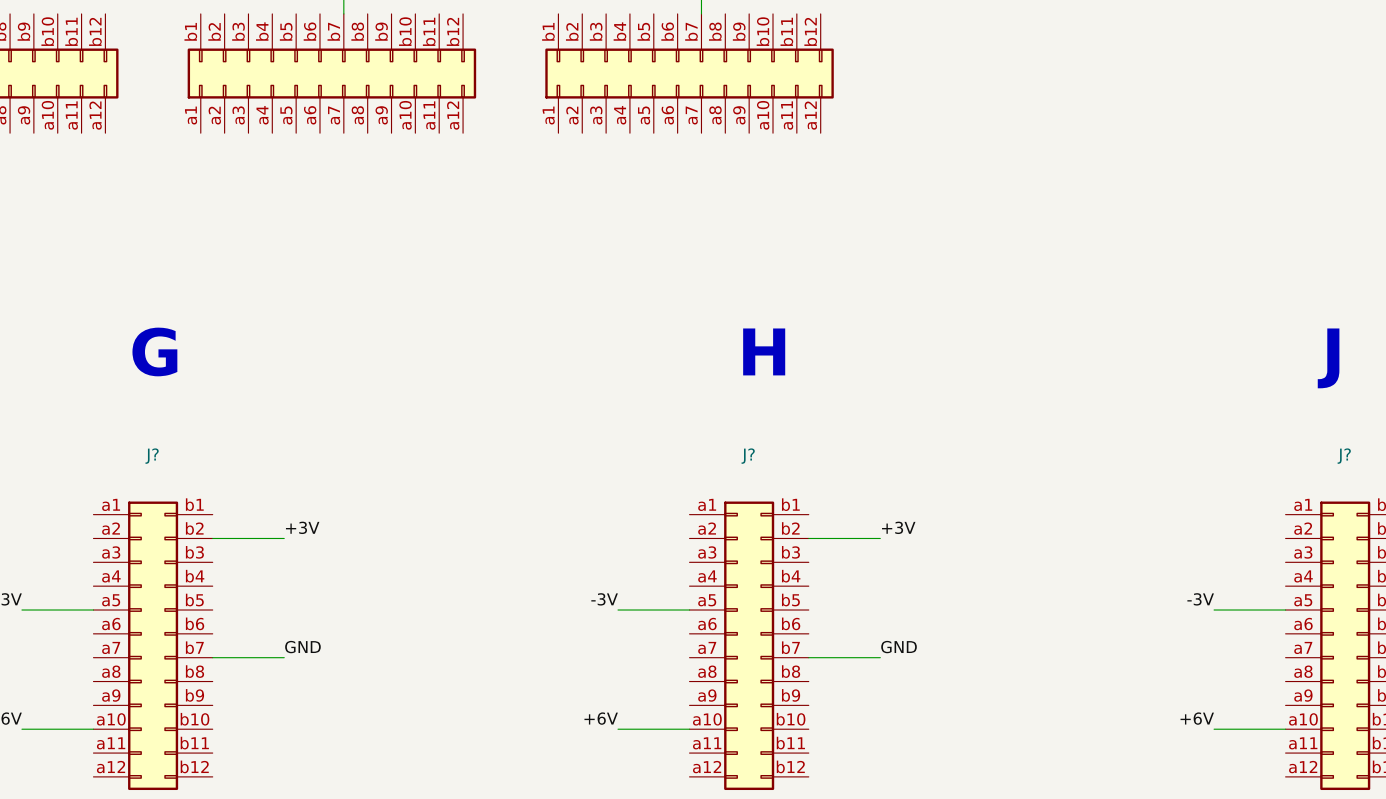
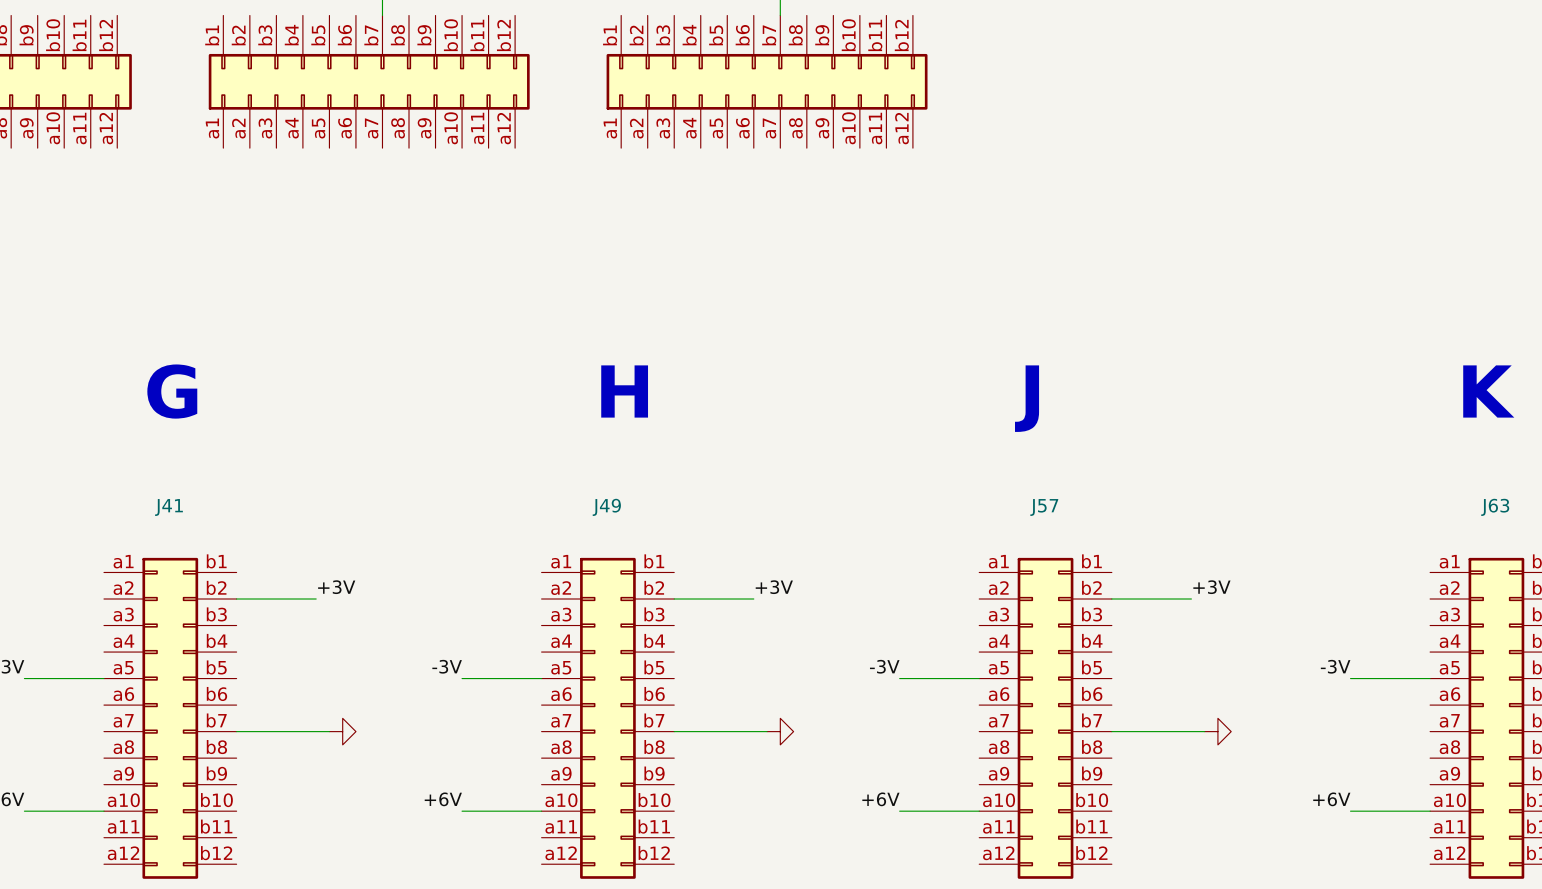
text position: H (764, 351) -> H (624, 391)
text: none -> K (1488, 391)
text: none -> J (1027, 398)
text: J (1328, 358) -> none
J? name: J? (152, 456) -> J41 (168, 507)
J? name: J? (1344, 456) -> J63 (1495, 507)
label: none -> +3V (774, 587)
label: +3V (898, 527) -> none
label: none -> +3V (1211, 587)
wire: none -> (674, 599) (753, 599)
wire: (808, 538) (880, 538) -> (1111, 599) (1191, 599)
label: none -> -3V (447, 666)
label: -3V (604, 599) -> none
label: none -> -3V (884, 666)
wire: none -> (462, 678) (541, 678)
wire: (618, 610) (689, 610) -> (899, 678) (979, 678)
J49: none -> (607, 718)
J?: (749, 645) -> none
J57: none -> (1045, 718)
label: GND (302, 647) -> none
label: GND (899, 647) -> none
wire: none -> (316, 731) (329, 731)
power symbol: none -> (342, 731)
wire: none -> (674, 731) (767, 731)
power symbol: none -> (780, 731)
wire: (808, 657) (880, 657) -> none
wire: none -> (1111, 731) (1204, 731)
power symbol: none -> (1217, 731)
label: none -> +6V (443, 799)
label: +6V (601, 718) -> none
label: none -> +6V (880, 799)
wire: none -> (462, 811) (541, 811)
wire: (618, 729) (689, 729) -> (899, 811) (979, 811)

